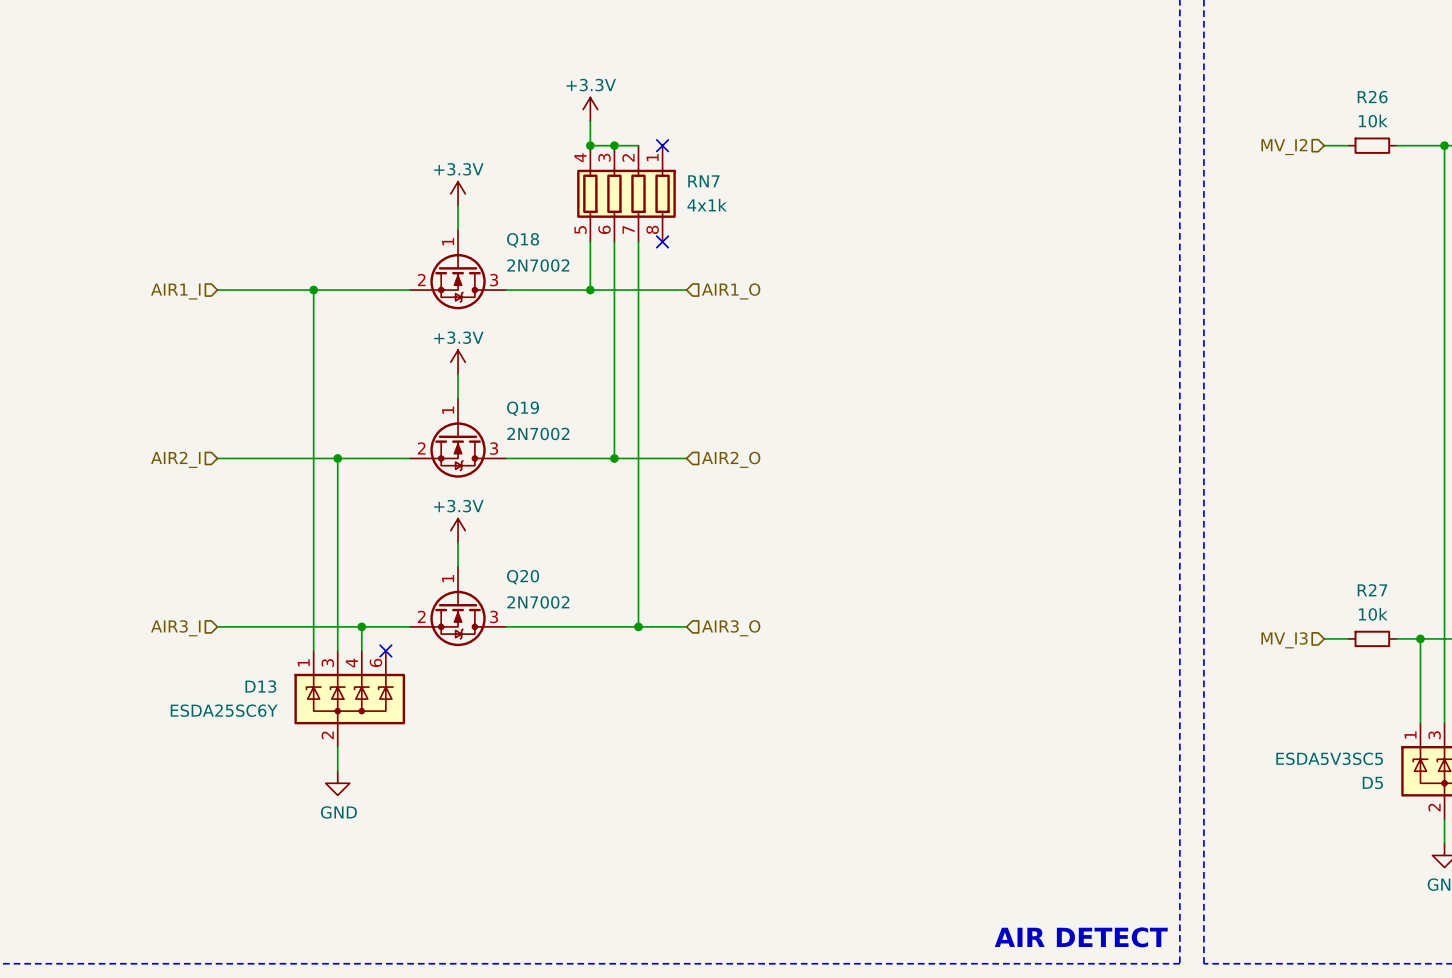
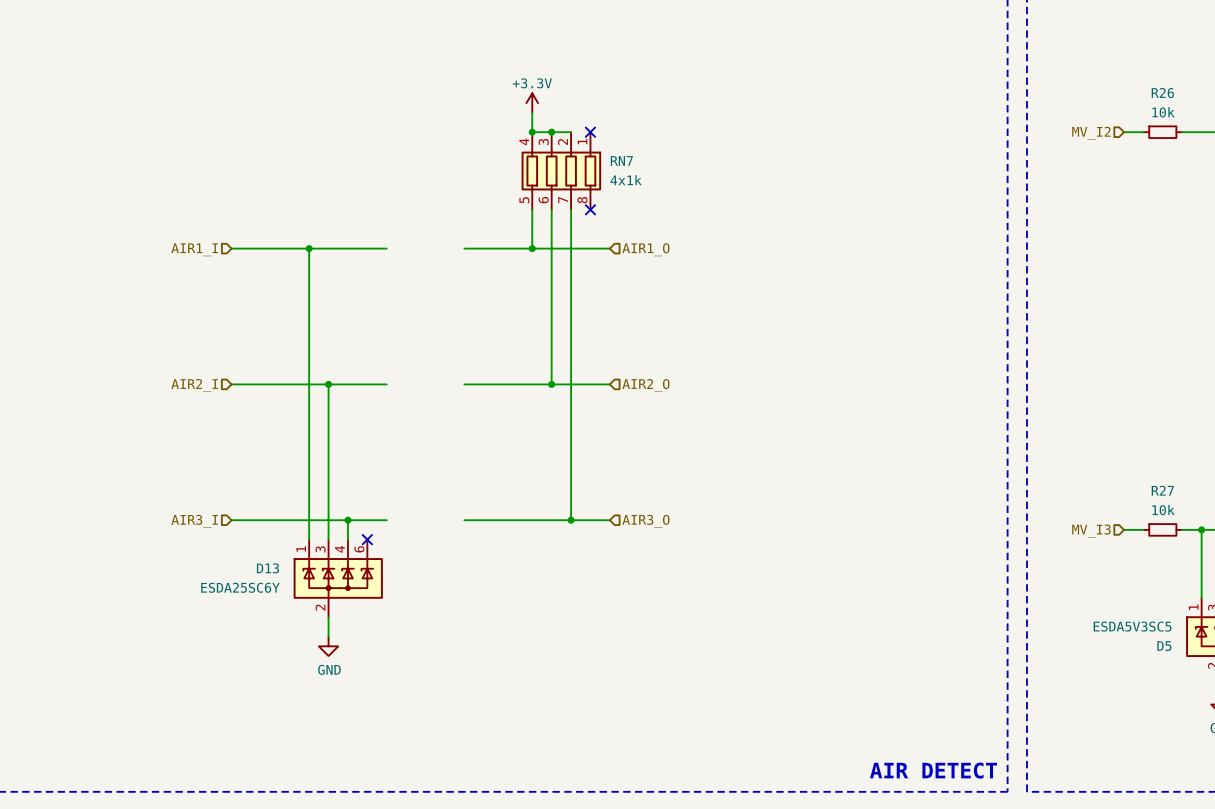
power symbol: +3.3V (458, 193) -> none
wire: (458, 205) (458, 229) -> none
Q18: 2N7002 (458, 269) -> none
power symbol: +3.3V (458, 362) -> none
wire: (458, 374) (458, 398) -> none
Q19: 2N7002 (458, 438) -> none
power symbol: +3.3V (458, 530) -> none
wire: (458, 542) (458, 566) -> none
Q20: 2N7002 (458, 606) -> none

